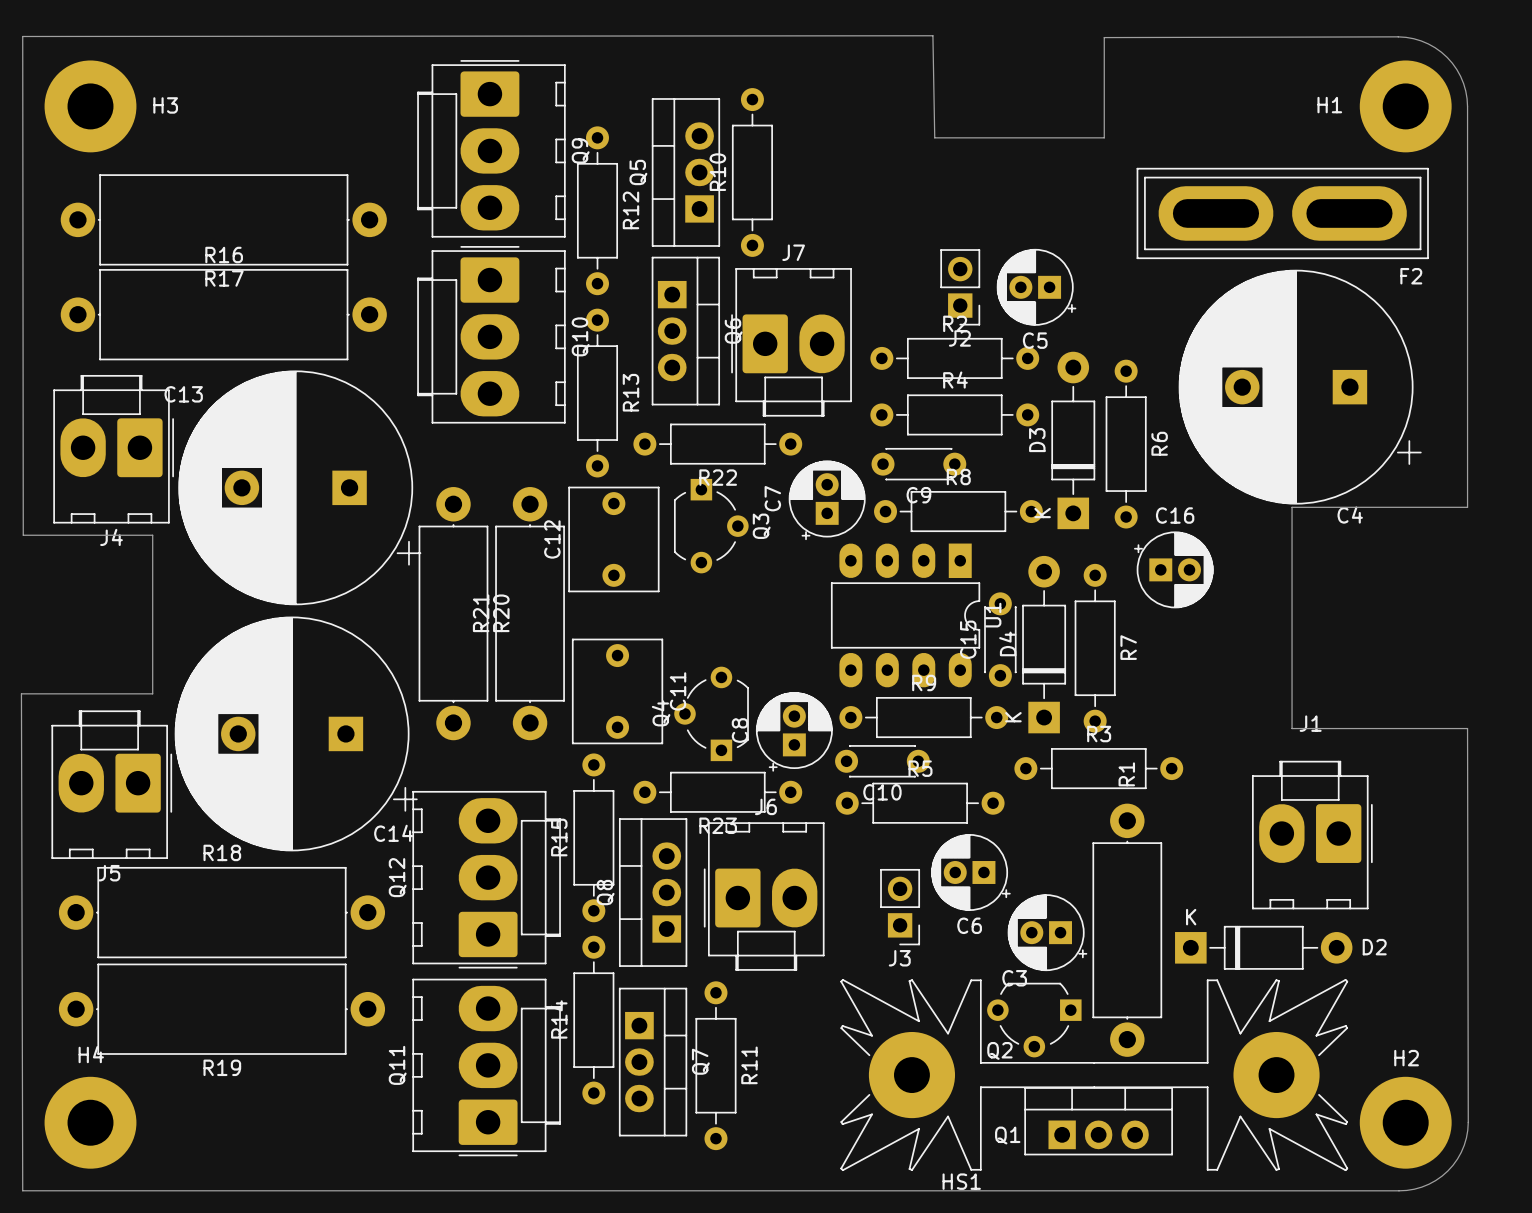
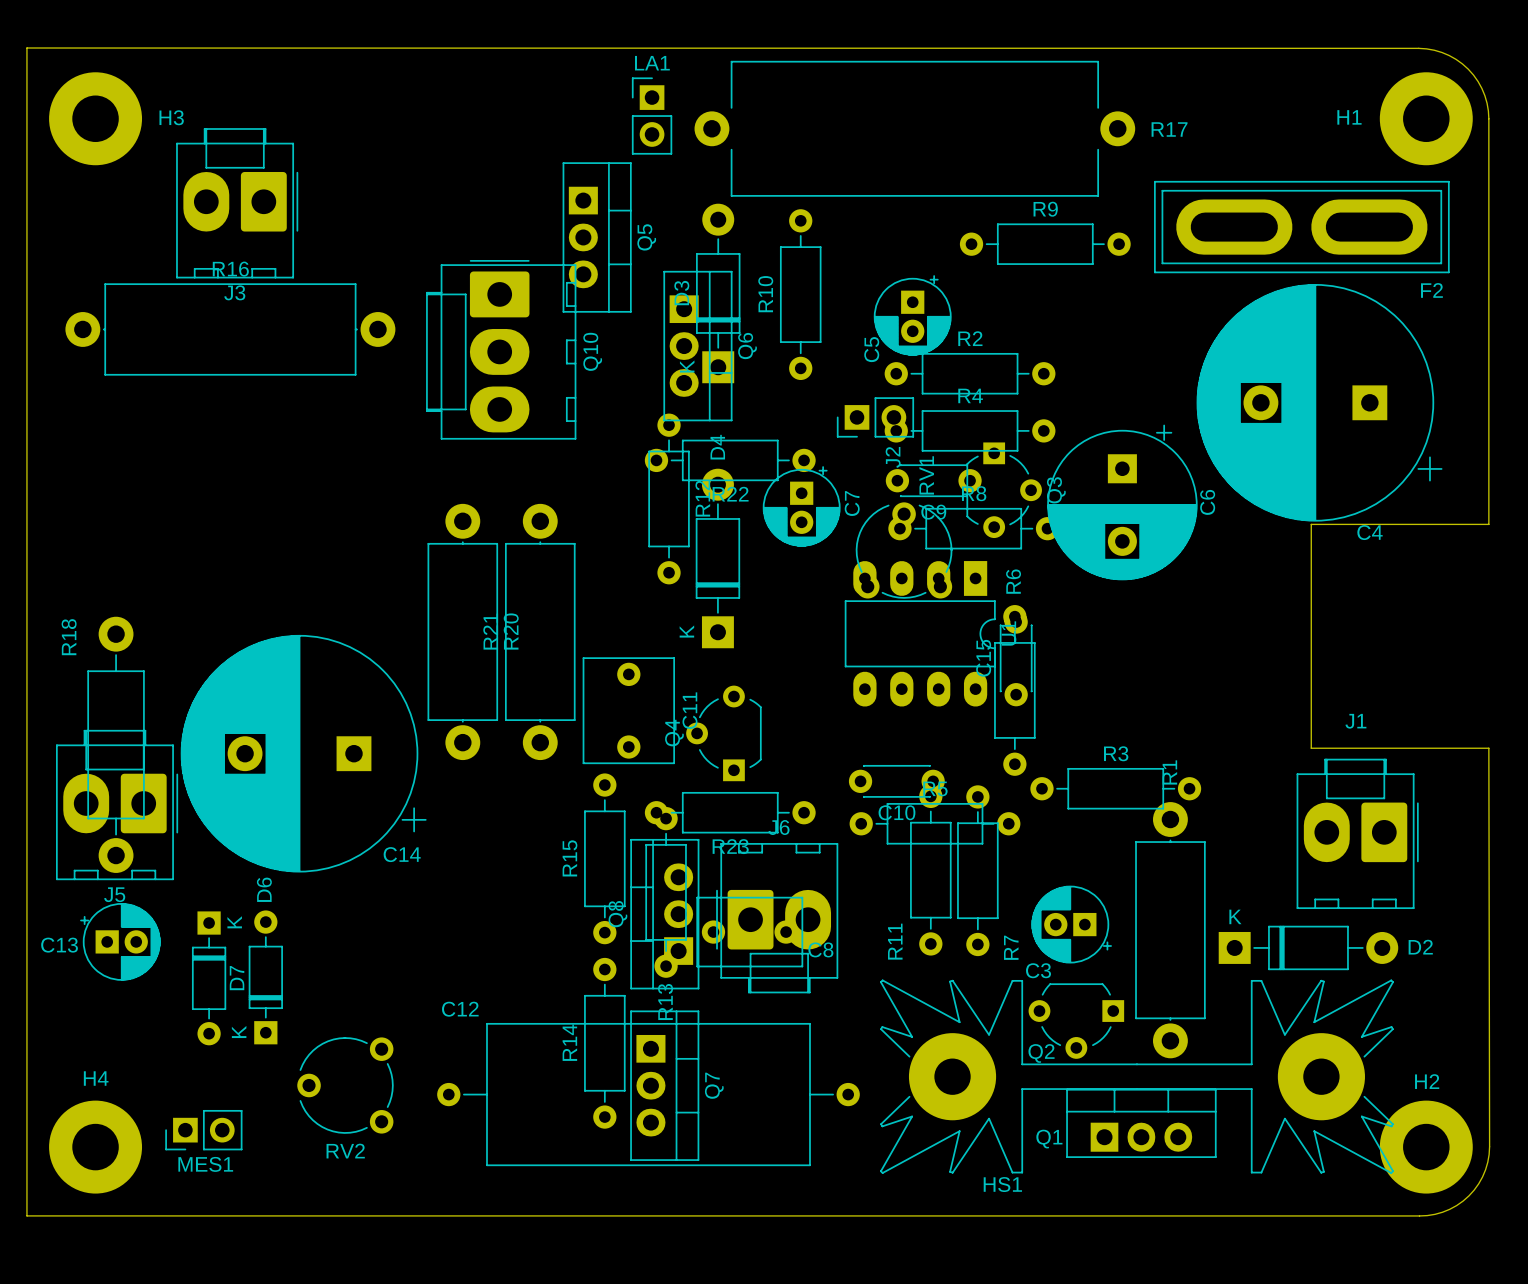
board edge: (1398, 36) (1104, 37) (1104, 137) (934, 137) (932, 35) (22, 36) (23, 535) (152, 535) (152, 693) (21, 693) (22, 1190) -> (1418, 48) (26, 48) (26, 1215)
LA1: none -> (652, 116)
Q9: (491, 148) -> none
Q5 rotation: 0° (685, 172) -> 180° (597, 237)
Q5 position: (685, 172) -> (597, 237)
R10 position: (752, 172) -> (800, 294)
R17 footprint: [60, 174, 387, 266] -> [694, 60, 1136, 197]
R12 position: (597, 210) -> (669, 498)
R17 name position: R17 (224, 278) -> R17 (1169, 129)
J2 rotation: 0° (960, 287) -> 90° clockwise (875, 417)
J2 position: (960, 287) -> (875, 417)
C5 rotation: 0° (1036, 287) -> 90° counterclockwise (912, 315)
C5 position: (1036, 287) -> (912, 315)
C5 name position: C5 (1035, 340) -> C5 (871, 349)
J7: (791, 342) -> none
C13 footprint: [178, 370, 422, 606] -> [80, 902, 161, 981]
R13 name position: R13 (630, 392) -> R13 (665, 1002)
R13 position: (597, 393) -> (666, 892)
C13 name position: C13 (183, 394) -> C13 (59, 945)
D3 position: (1073, 440) -> (718, 293)
R6 name position: R6 (1159, 443) -> R6 (1013, 581)
R6 position: (1126, 444) -> (1014, 690)
J4: (113, 449) -> none
C12 footprint: [568, 486, 660, 593] -> [437, 1022, 860, 1167]
C7 rotation: 0° (827, 500) -> 180° (801, 506)
Q3 position: (711, 526) -> (1004, 490)
RV1: none -> (904, 550)
C12 name position: C12 (552, 539) -> C12 (460, 1009)
C16: (1173, 569) -> none
D4 name position: D4 (1007, 643) -> D4 (717, 447)
D4 position: (1044, 644) -> (717, 558)
R7 name position: R7 (1128, 647) -> R7 (1011, 947)
R7 position: (1095, 648) -> (977, 870)
C8 footprint: [755, 692, 833, 772] -> [696, 896, 804, 968]
R9 position: (923, 717) -> (1045, 244)
C8 name position: C8 (740, 730) -> C8 (820, 949)
C6 footprint: [931, 834, 1011, 911] -> [1047, 424, 1198, 581]
J1 position: (1312, 835) -> (1357, 833)
R18 name position: R18 (222, 852) -> R18 (69, 637)
R18 footprint: [58, 866, 386, 959] -> [87, 616, 145, 873]
J3 footprint: [880, 868, 921, 946] -> [176, 128, 299, 279]
Q12: (486, 879) -> none
C6 name position: C6 (969, 925) -> C6 (1207, 502)
R1 position: (1127, 930) -> (1170, 930)
C3 position: (1047, 932) -> (1071, 924)
D2 position: (1263, 947) -> (1308, 947)
D7: none -> (209, 978)
D6: none -> (265, 977)
J3 name position: J3 (899, 958) -> J3 (234, 292)
R19: (221, 1009) -> none
Q2 position: (1034, 1020) -> (1076, 1021)
RV2: none -> (345, 1085)
R11 position: (715, 1065) -> (930, 870)
R11 name position: R11 (749, 1065) -> R11 (895, 941)
Q11: (486, 1067) -> none
HS1 position: (1094, 1075) -> (1136, 1076)
MES1: none -> (203, 1130)
Q1 position: (1098, 1121) -> (1141, 1123)

